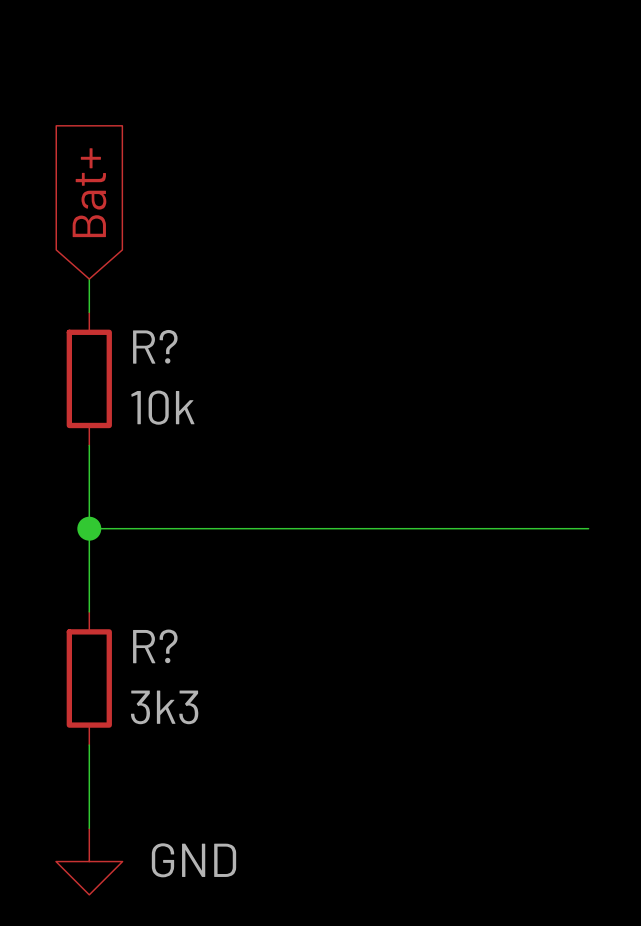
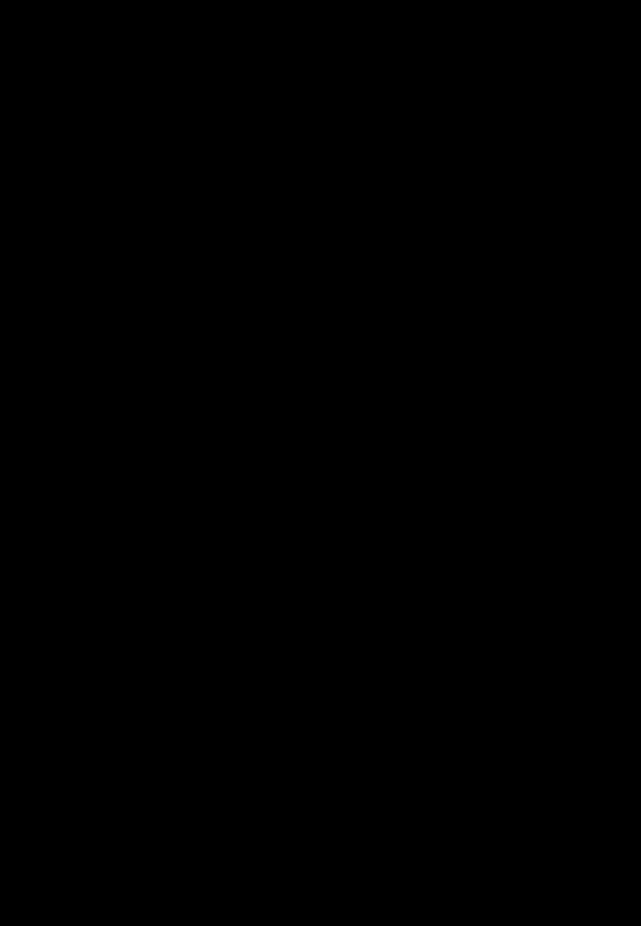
global label: Bat+ (89, 192) -> none
wire: (89, 279) (89, 312) -> none
R?: 10k (89, 378) -> none
wire: (89, 445) (89, 611) -> none
wire: (89, 528) (588, 528) -> none
junction: (89, 528) -> none
R?: 3k3 (89, 678) -> none
wire: (89, 745) (89, 828) -> none
power symbol: GND (89, 861) -> none

